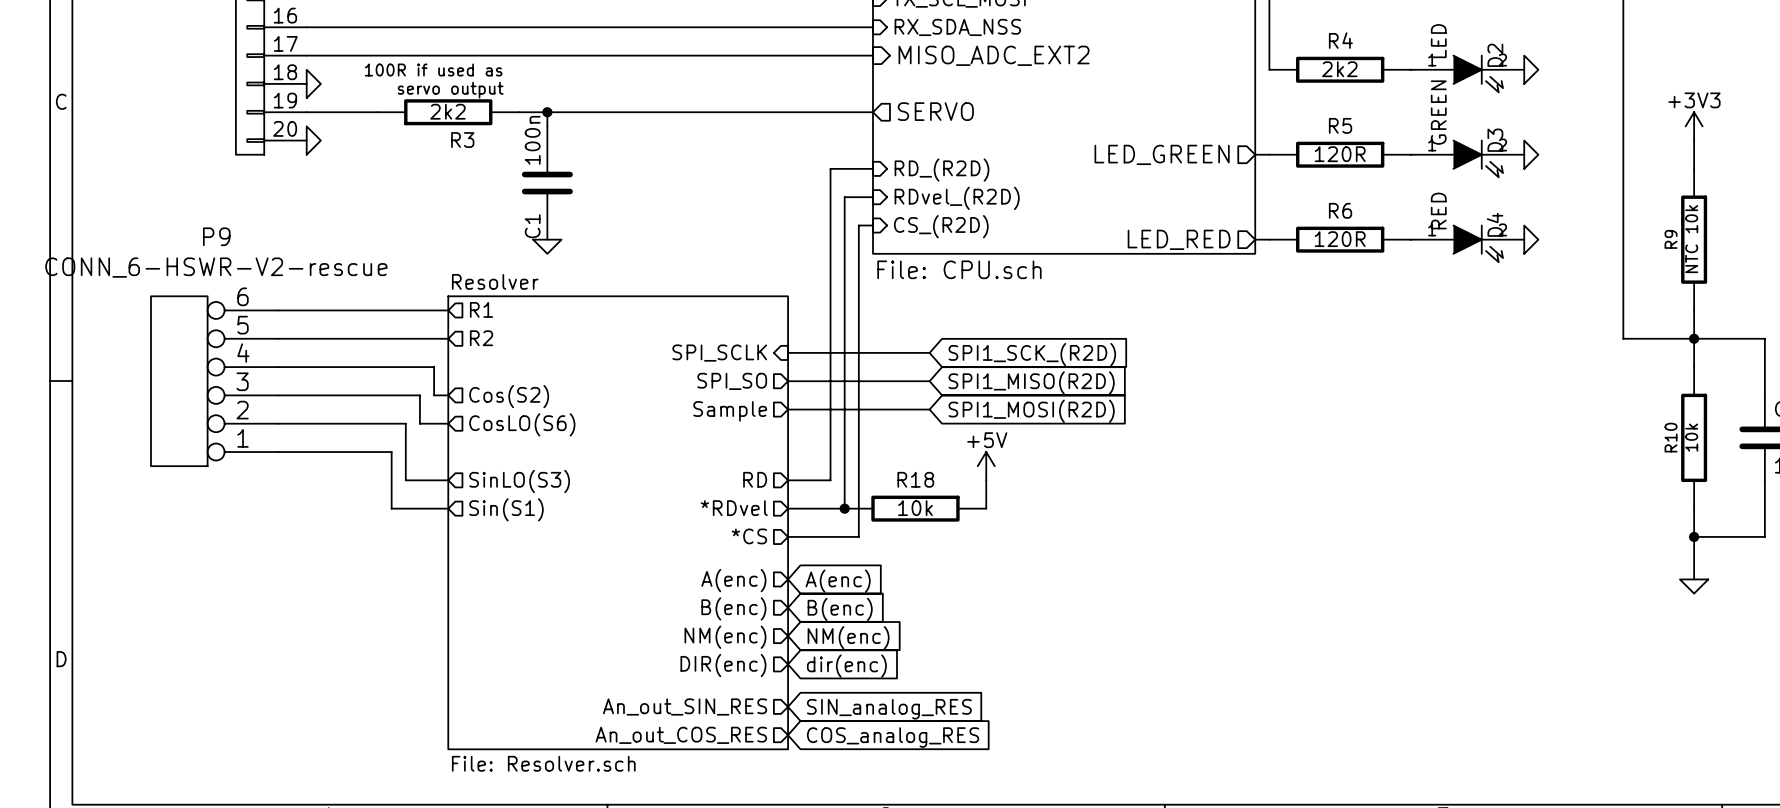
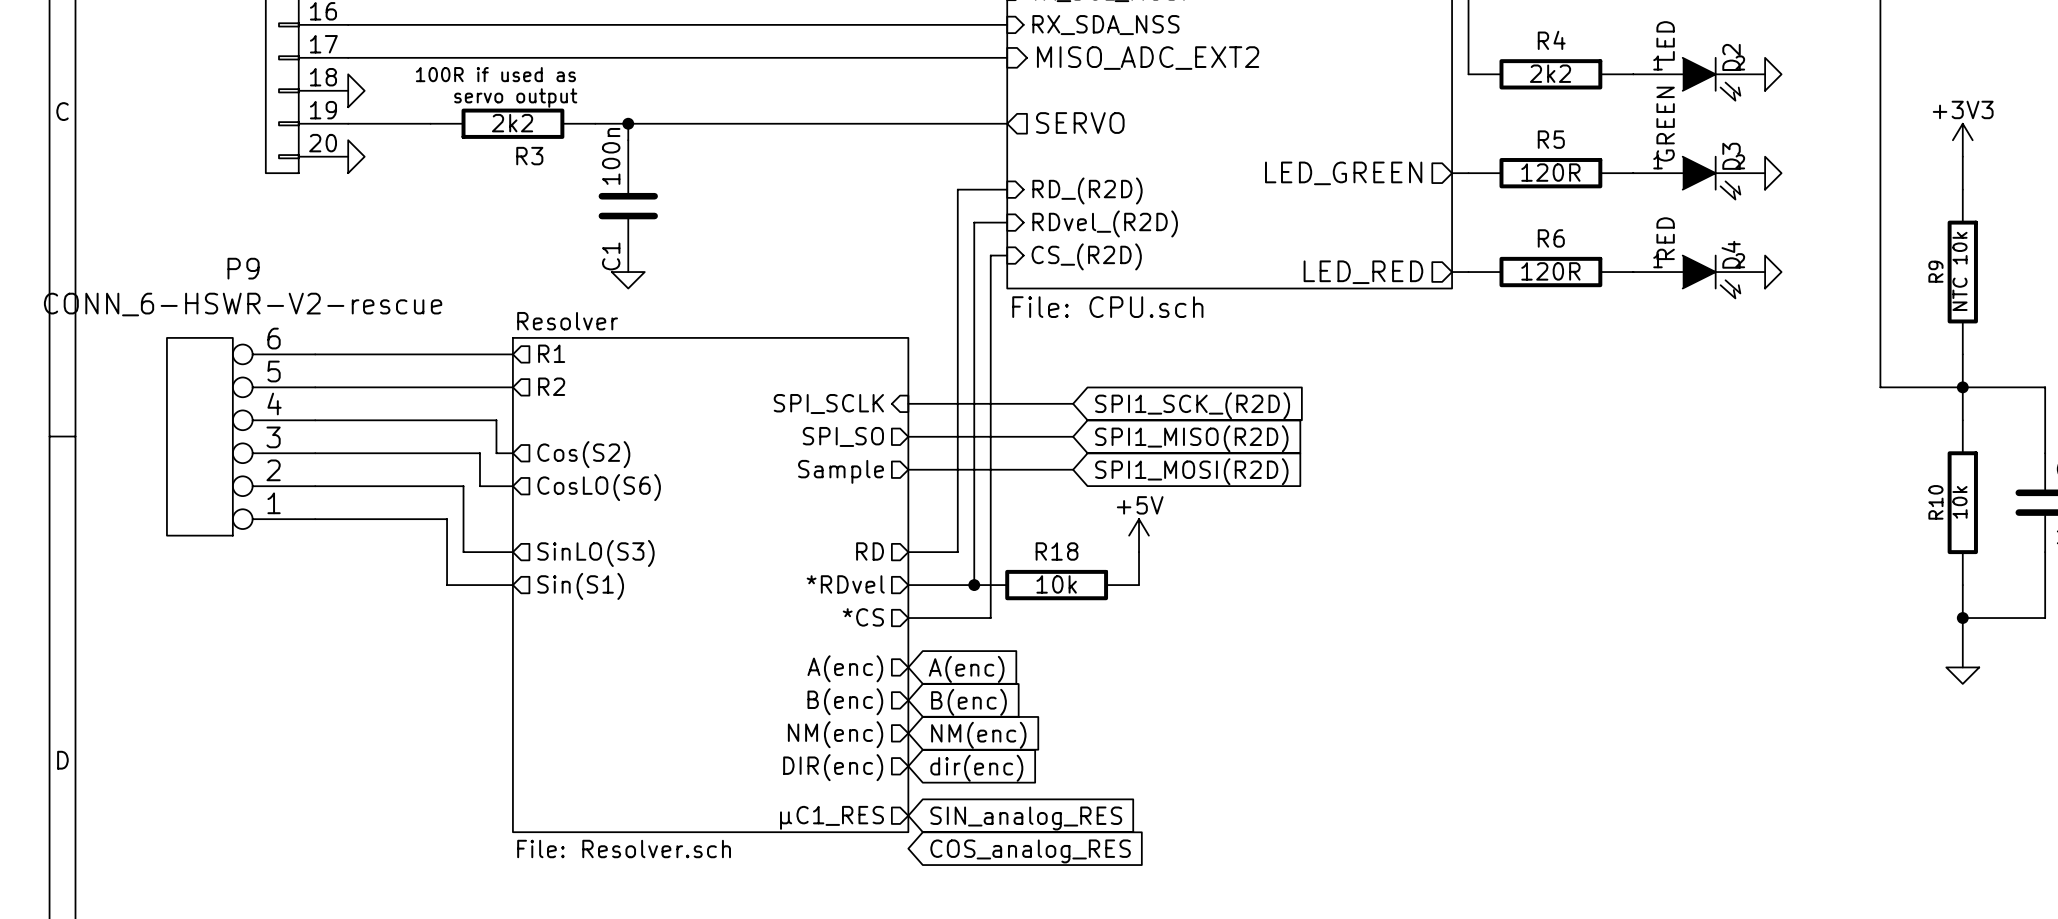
sheet Resolver: none -> File: Resolver.sch (710, 585)
sheet Resolver: File: Resolver.sch (618, 522) -> none
sheet pin: An_out_SIN_RES (685, 707) -> µC1_RES (832, 817)
sheet pin: An_out_COS_RES (681, 735) -> none

